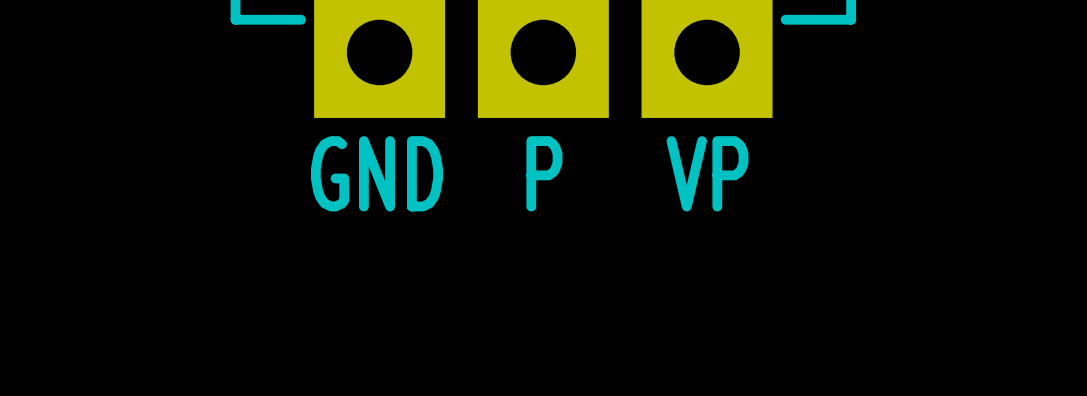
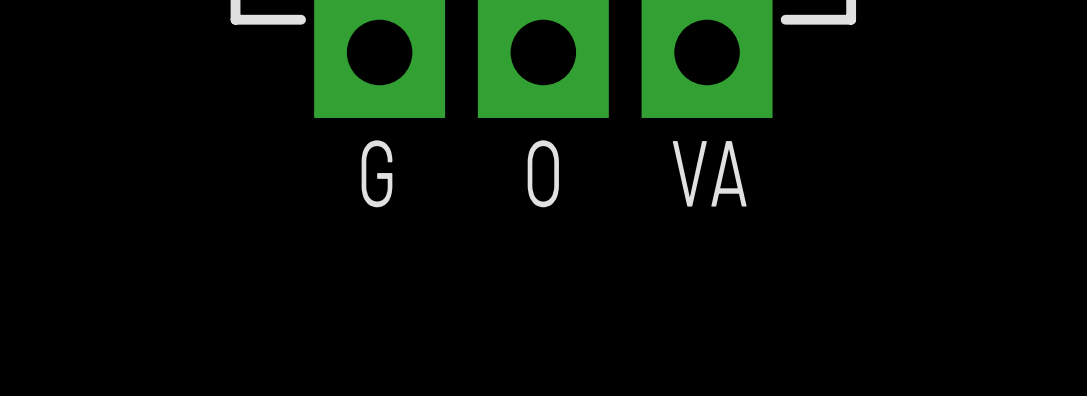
text: GND (376, 173) -> G (376, 173)
text: P (544, 173) -> O (543, 173)
text: VP (707, 173) -> VA (709, 173)

